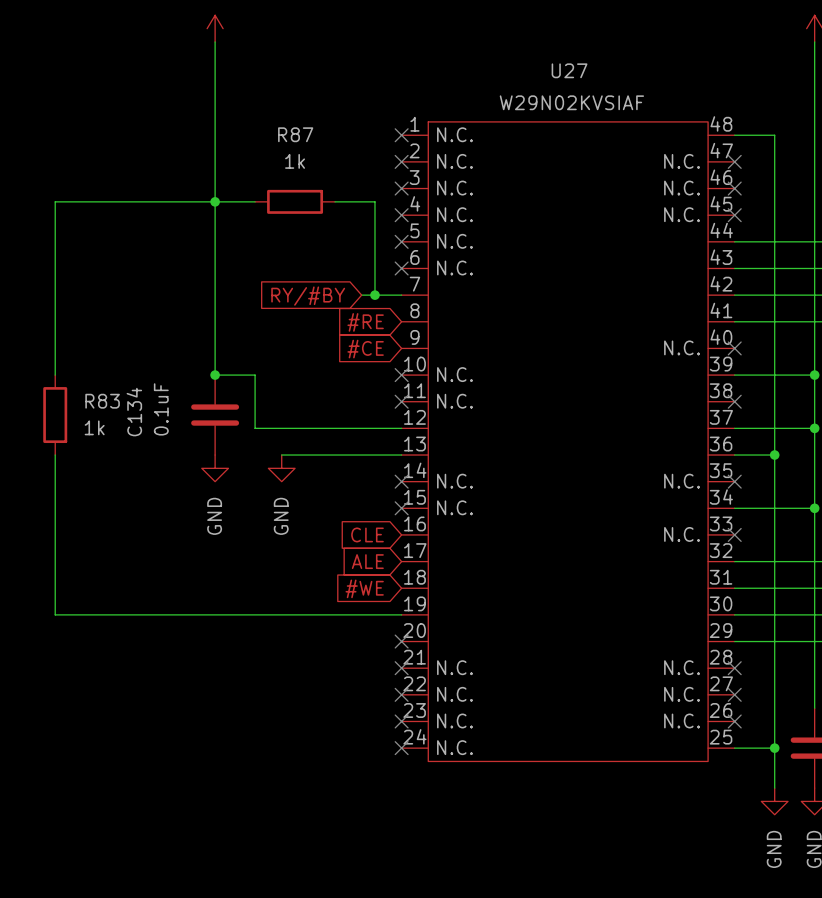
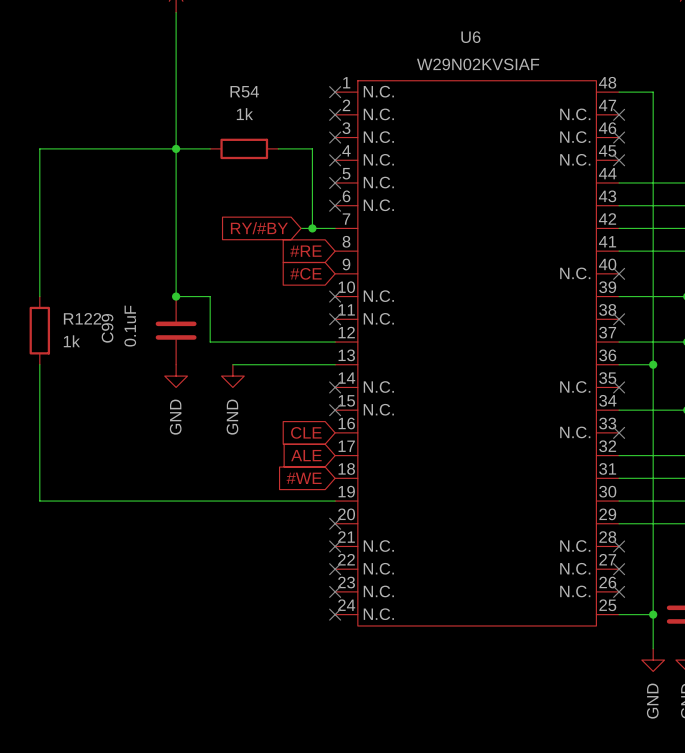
U27 name: U27 (569, 70) -> U6 (470, 37)
R87 name: R87 (295, 134) -> R54 (244, 91)
R83 name: R83 (102, 401) -> R122 (82, 318)
C134 name: C134 (134, 412) -> C99 (107, 328)

